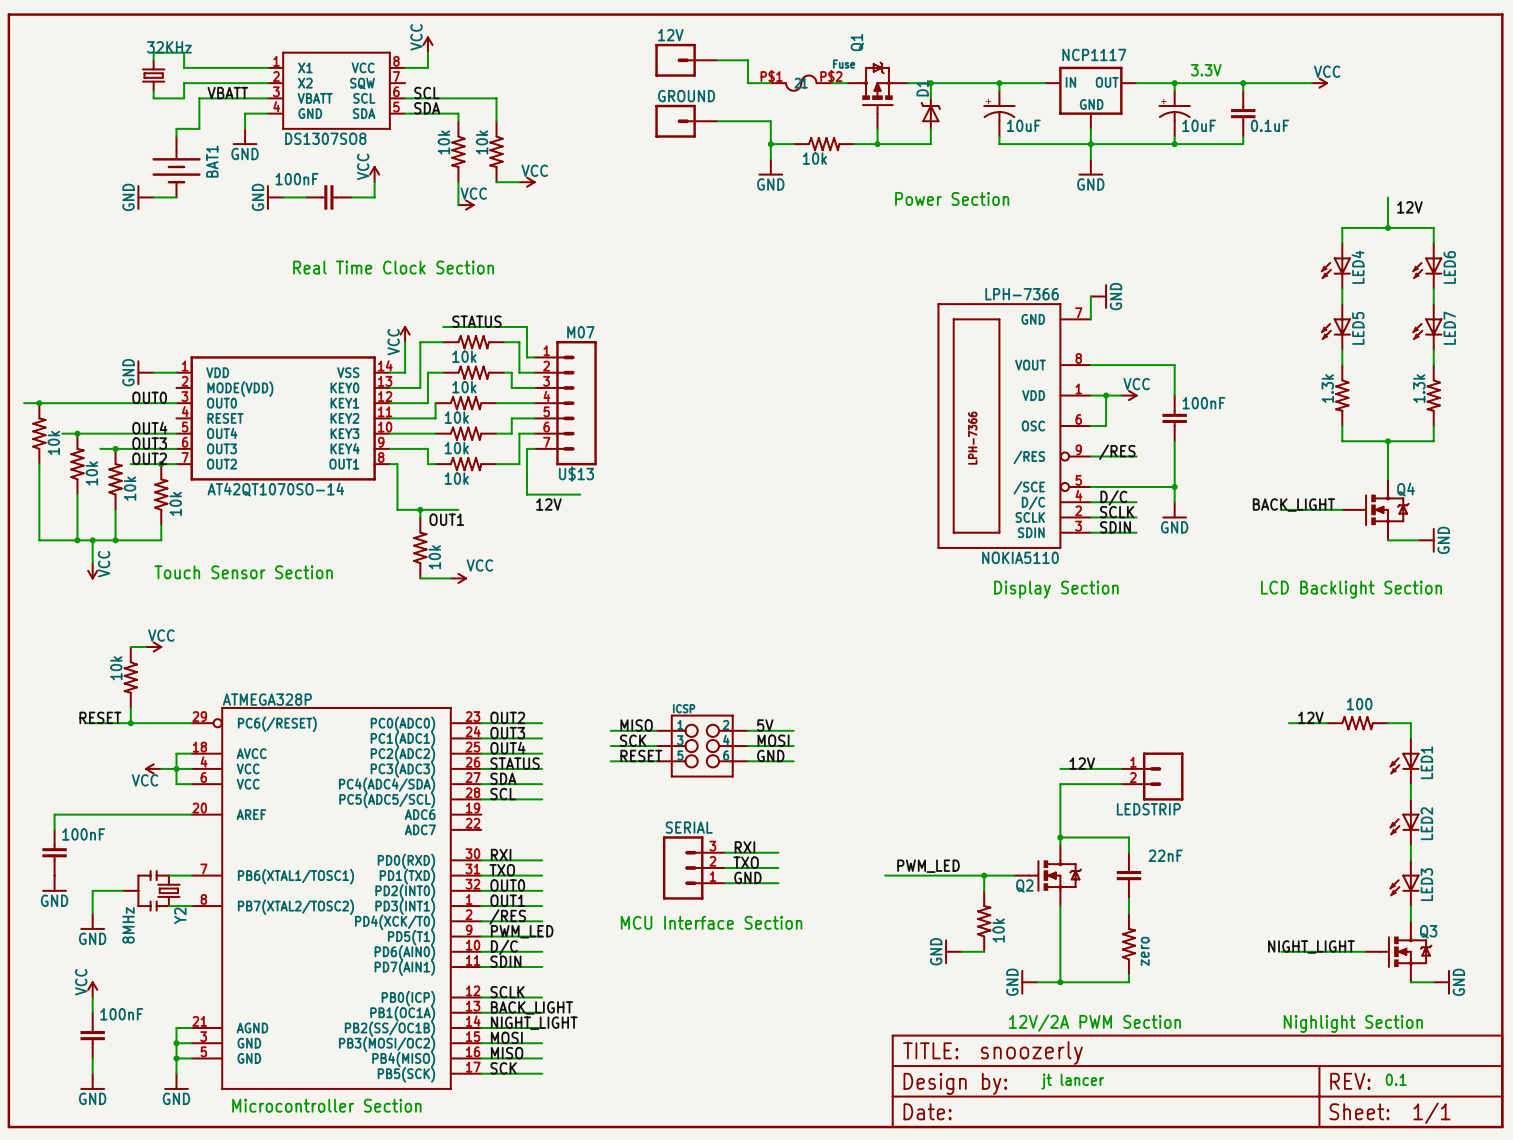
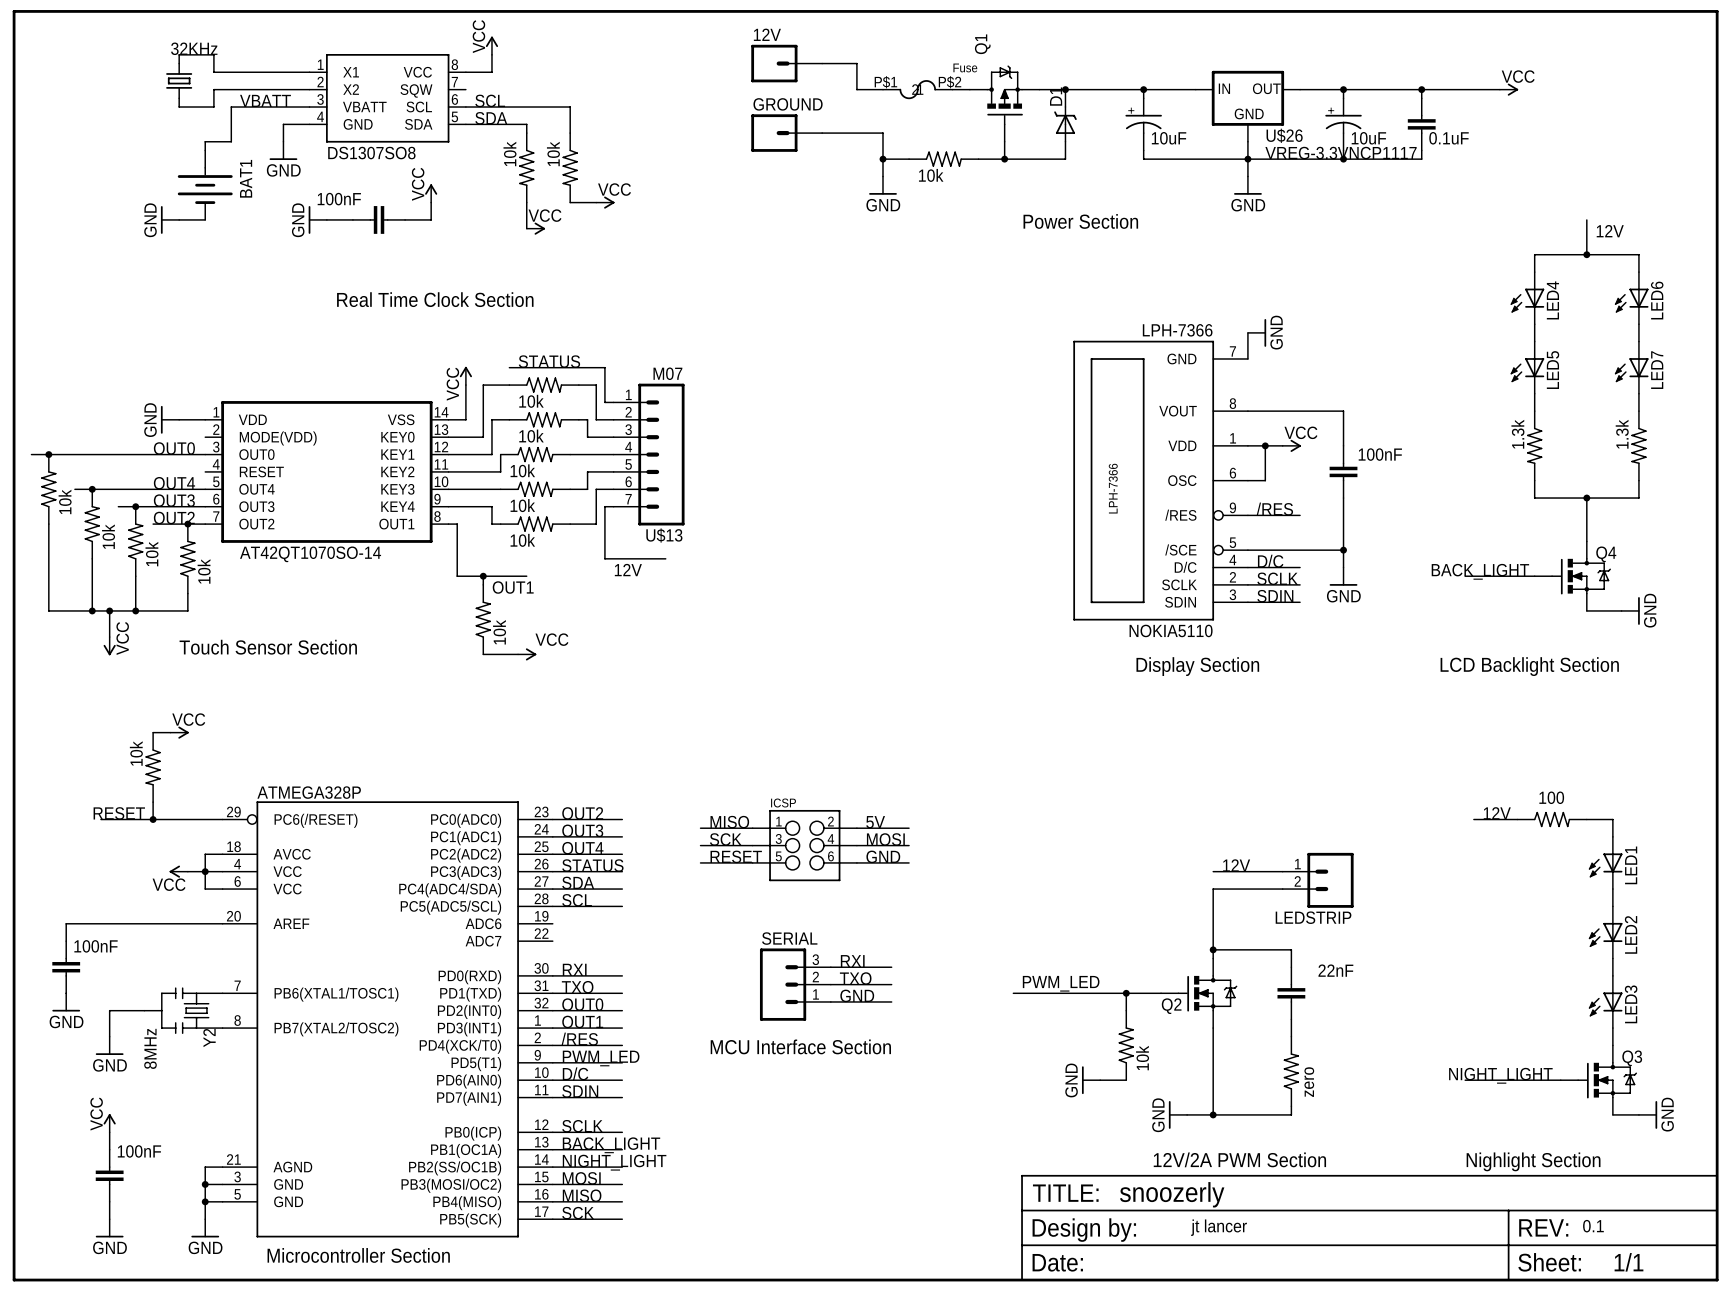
NCP1117 name: NCP1117 (1094, 54) -> U$26 (1284, 135)
text: 3.3V (1206, 70) -> none
NCP1117 value: none -> VREG-3.3VNCP1117 (1341, 153)

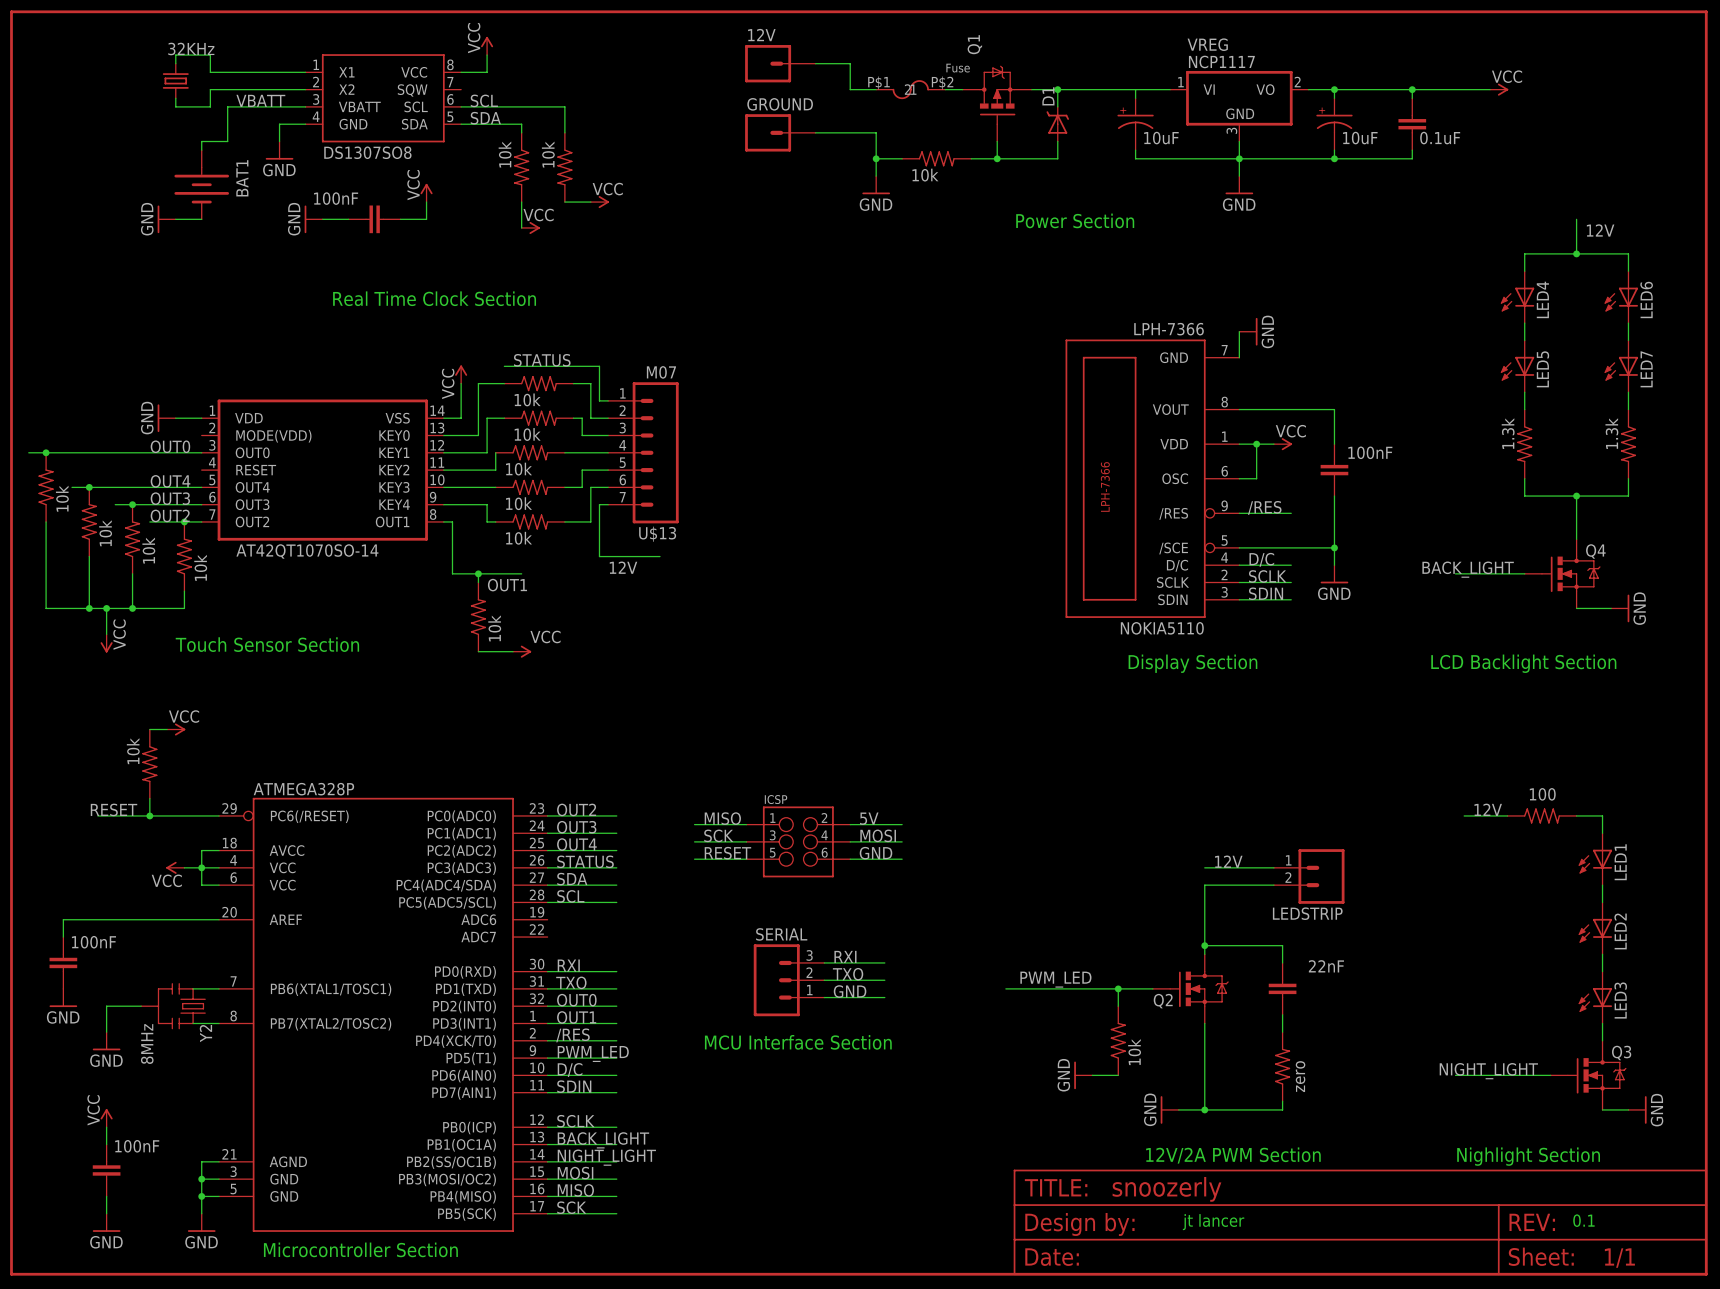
junction: (1143, 89) -> none
U$26: VREG-3.3VNCP1117 (1247, 106) -> none
VREG: none -> NCP1117 (1239, 106)

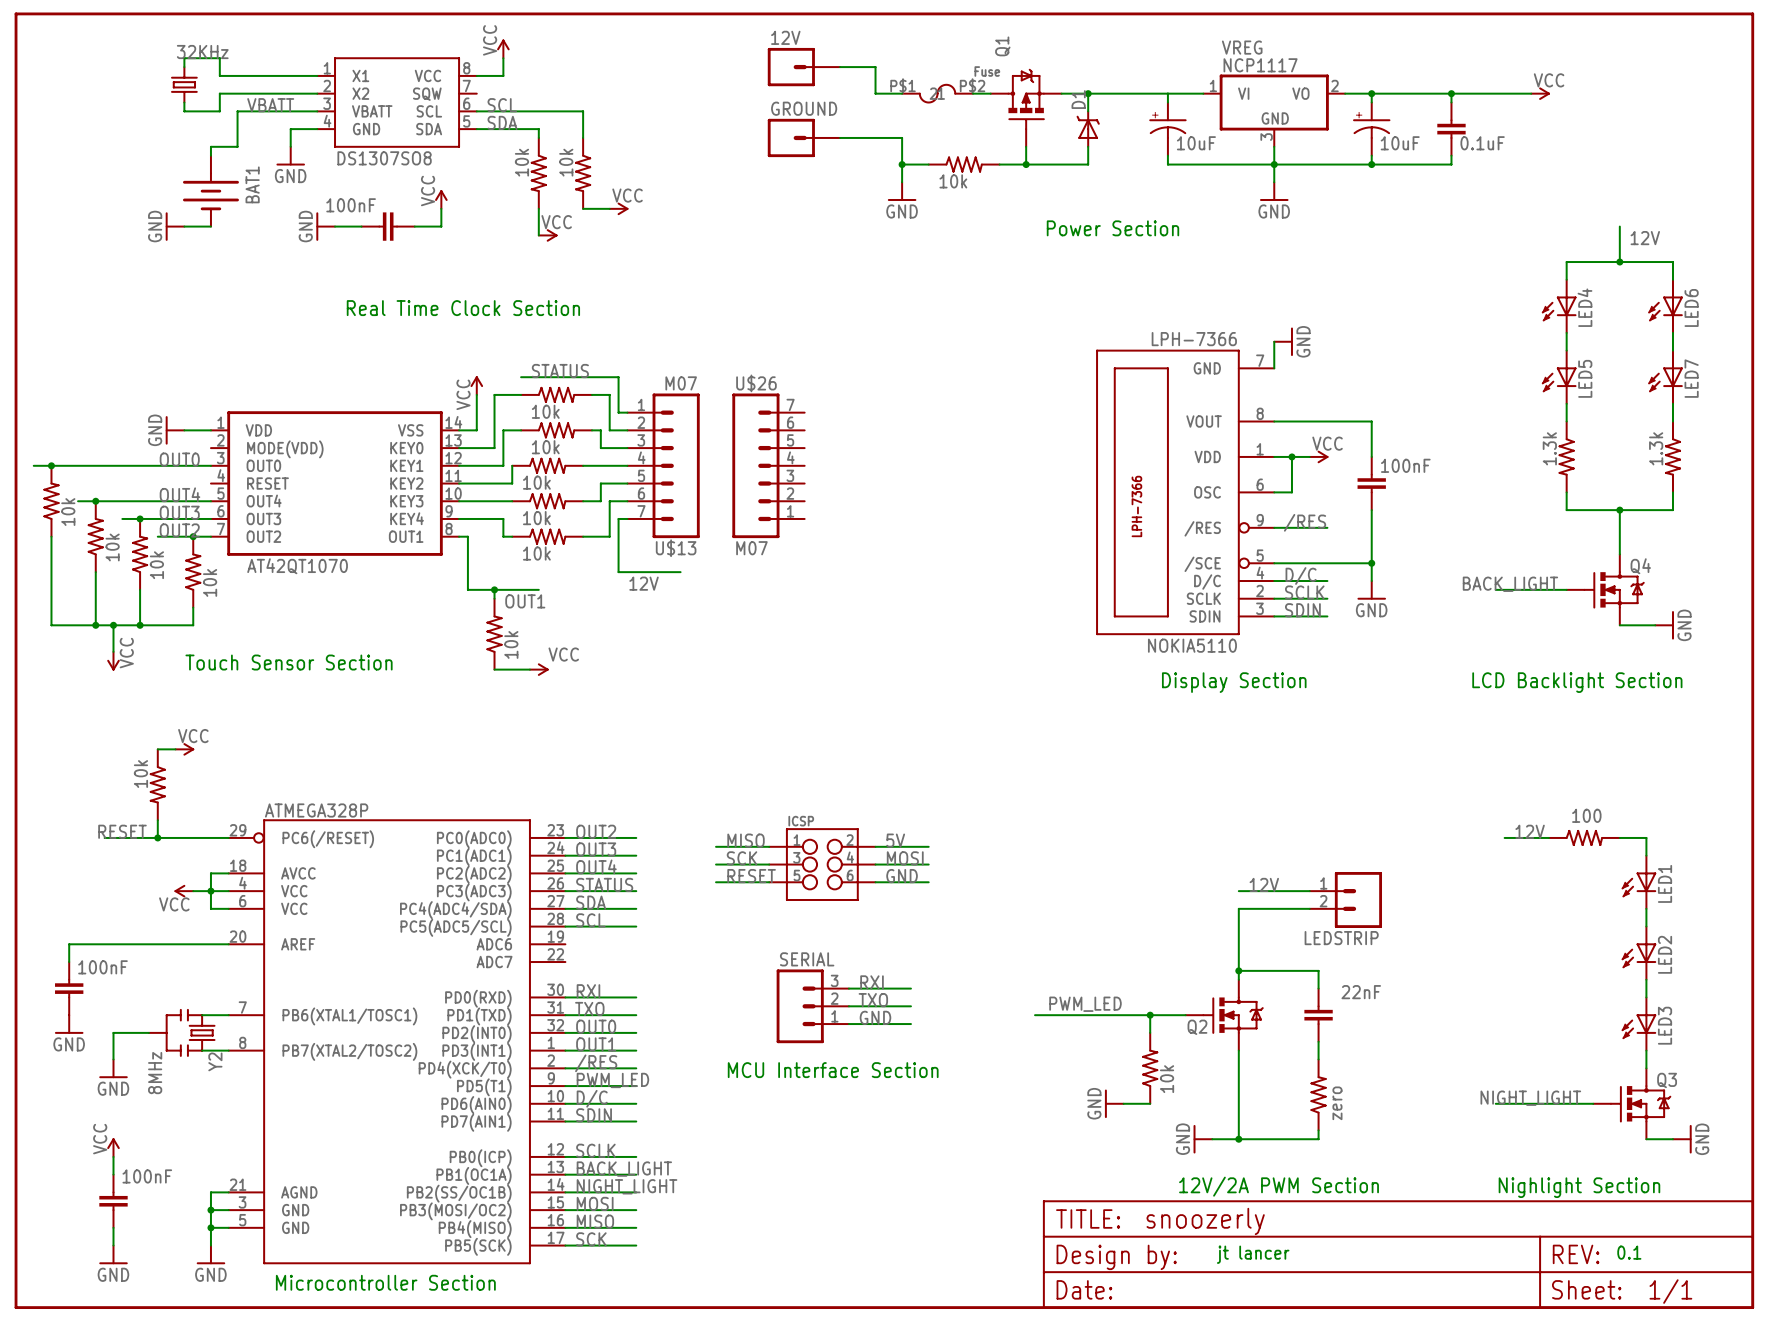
U$26: none -> M07 (768, 465)
part value: AT42QT1070SO-14 (307, 551) -> AT42QT1070 (297, 566)

